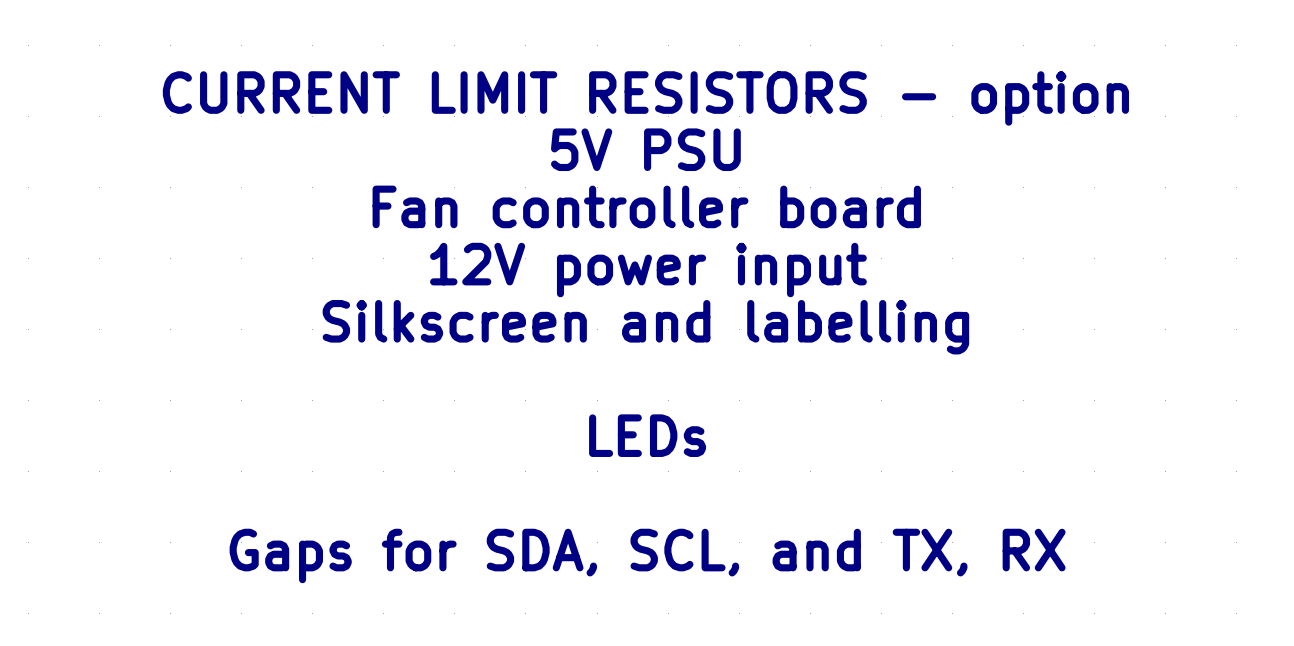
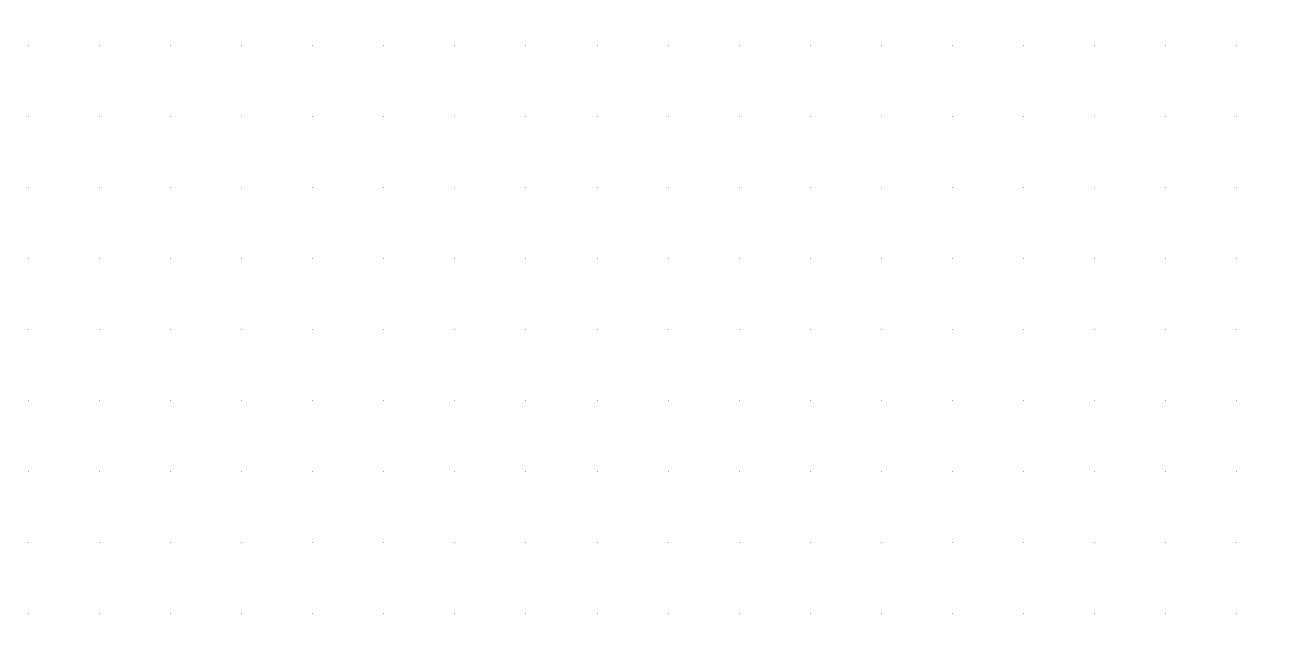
text: CURRENT LIMIT RESISTORS - option (645, 98) -> none
text: 5V PSU (645, 149) -> none
text: Fan controller board (646, 206) -> none
text: 12V power input (648, 270) -> none
text: Silkscreen and labelling (645, 327) -> none
text: LEDs (647, 435) -> none
text: Gaps for SDA, SCL, and TX, RX (647, 555) -> none

